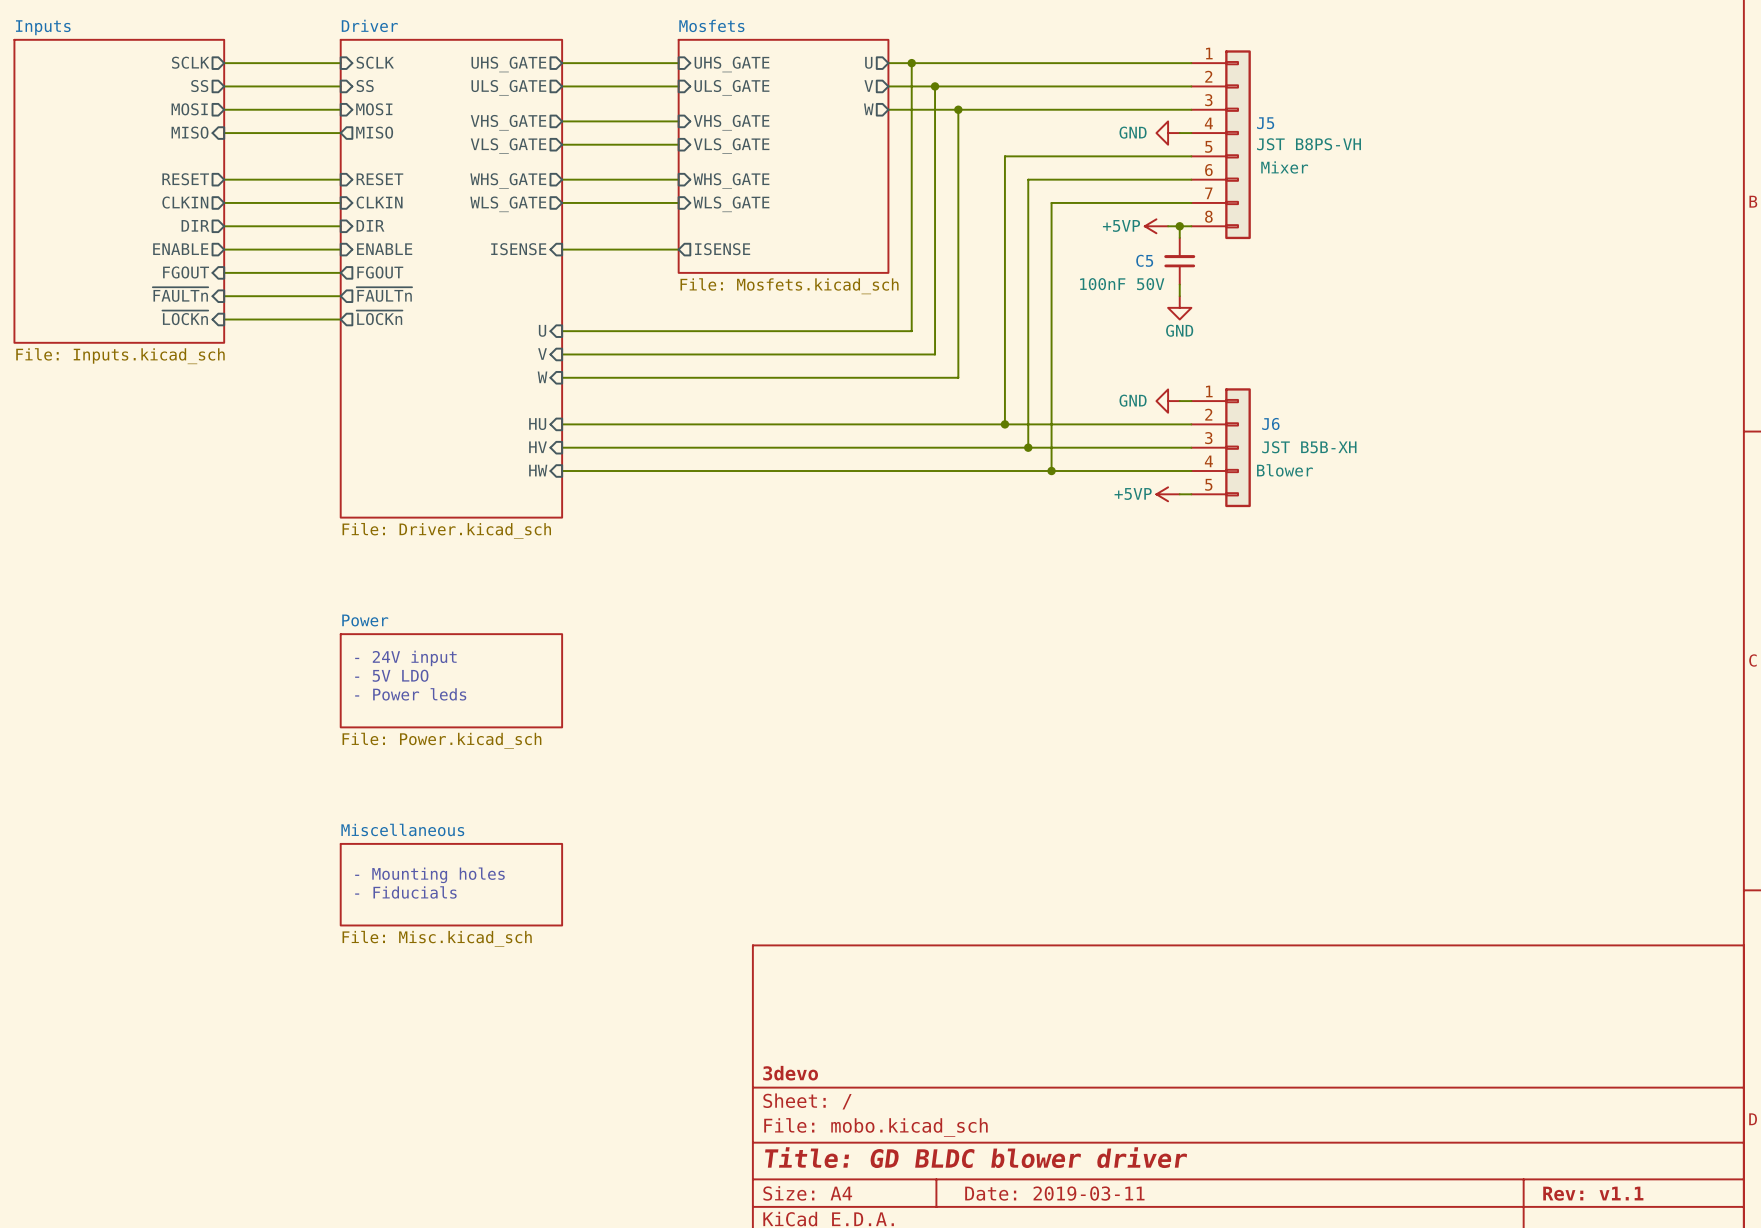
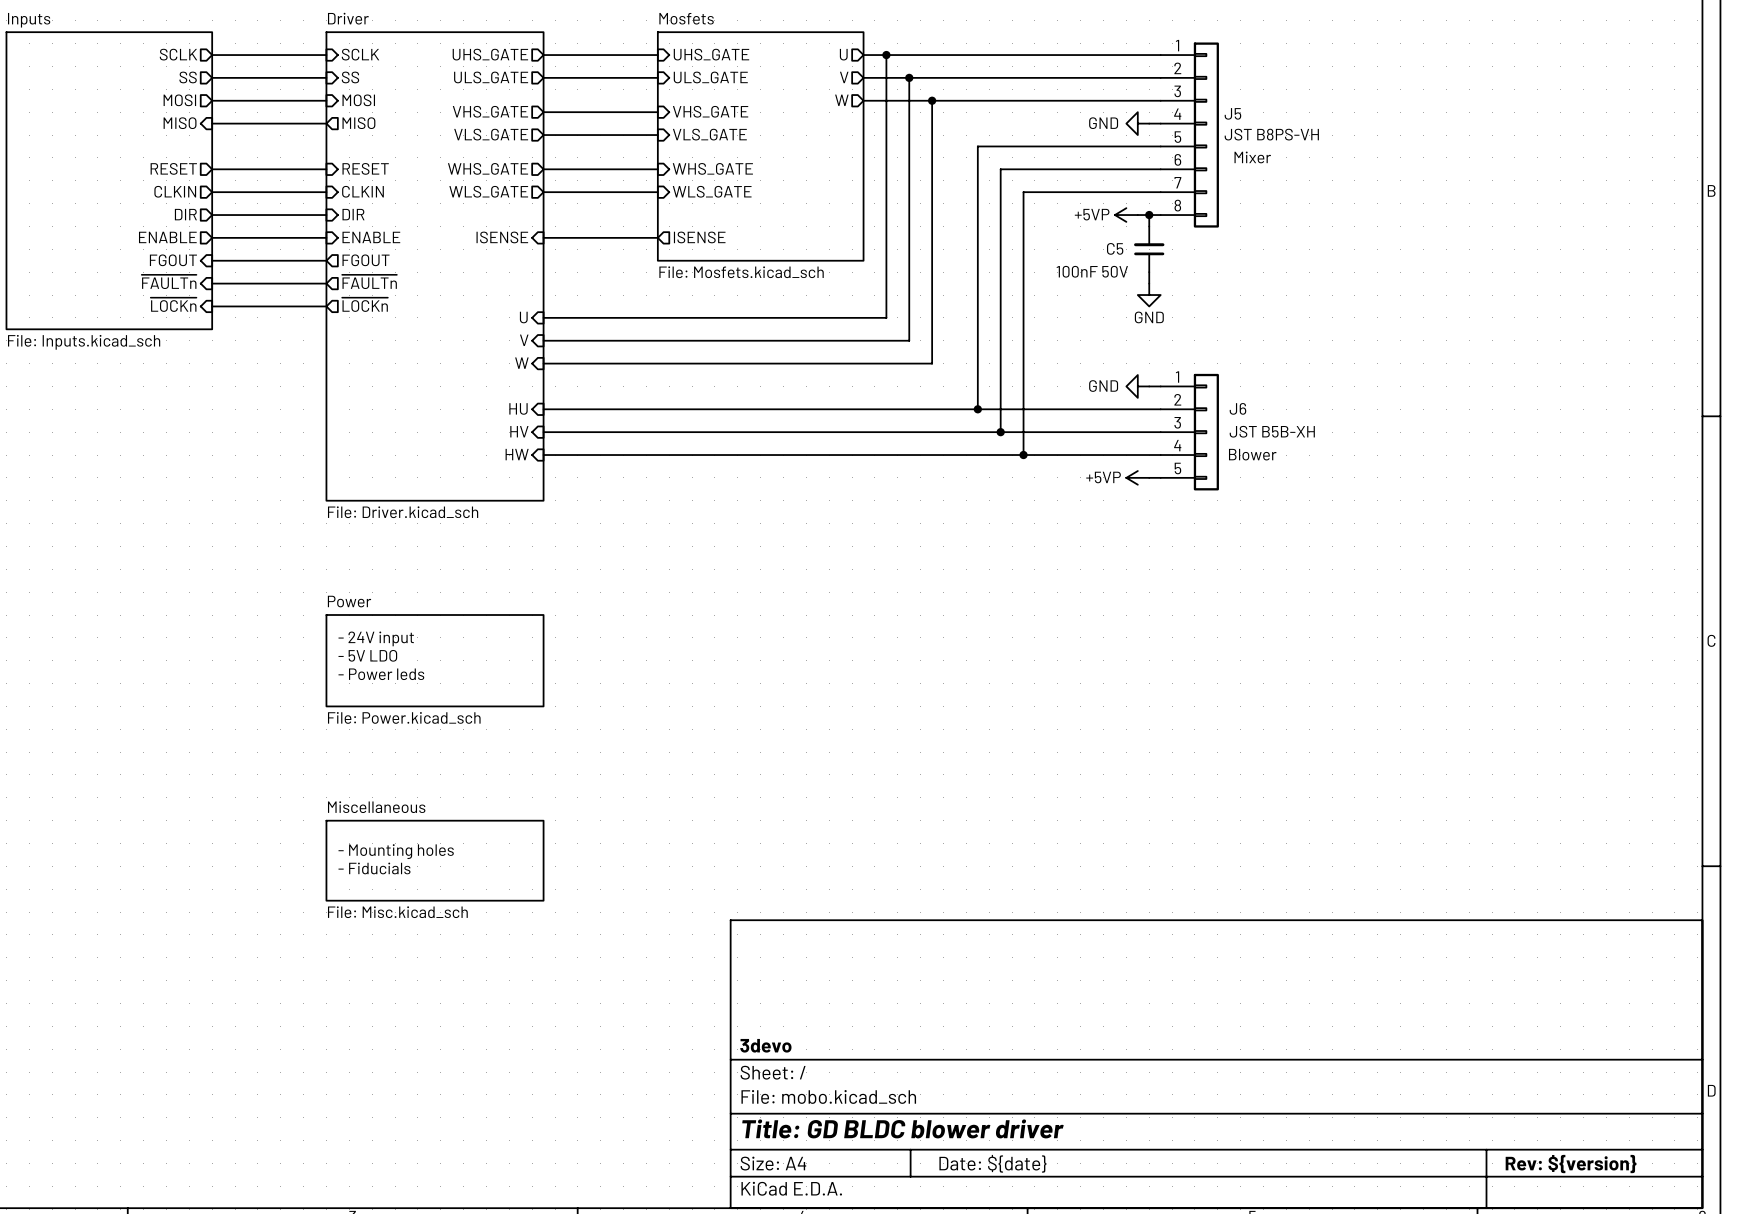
title block: Date: 2019-03-11 (1054, 1193) -> Date: ${date} (992, 1163)
title block: Rev: v1.1 (1593, 1193) -> Rev: ${version} (1571, 1164)

